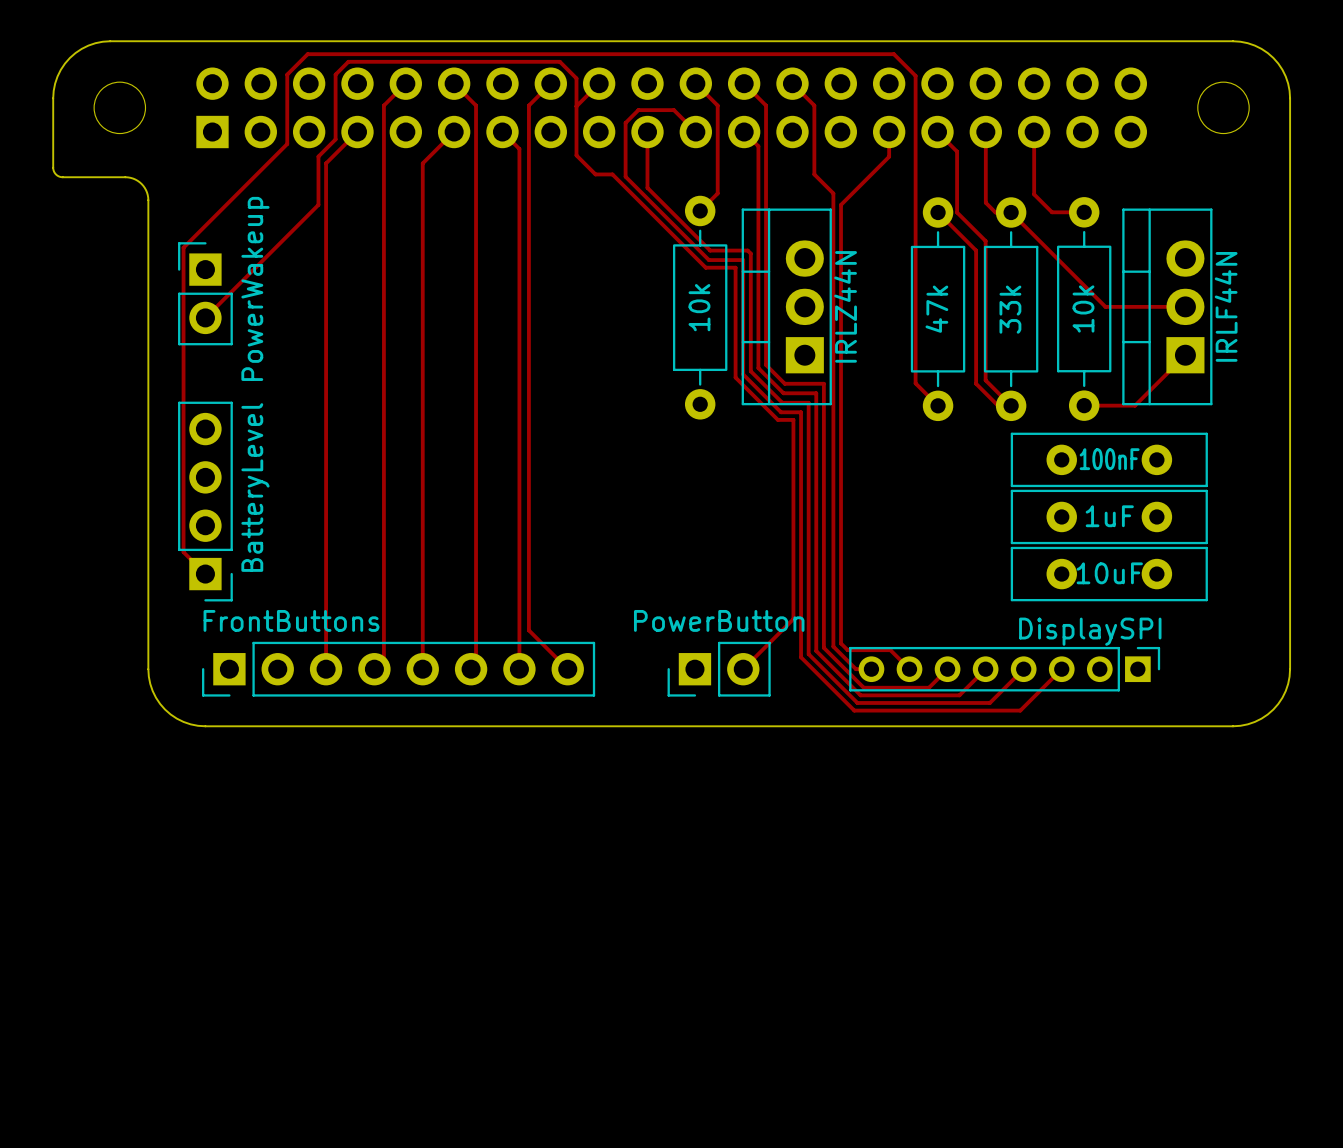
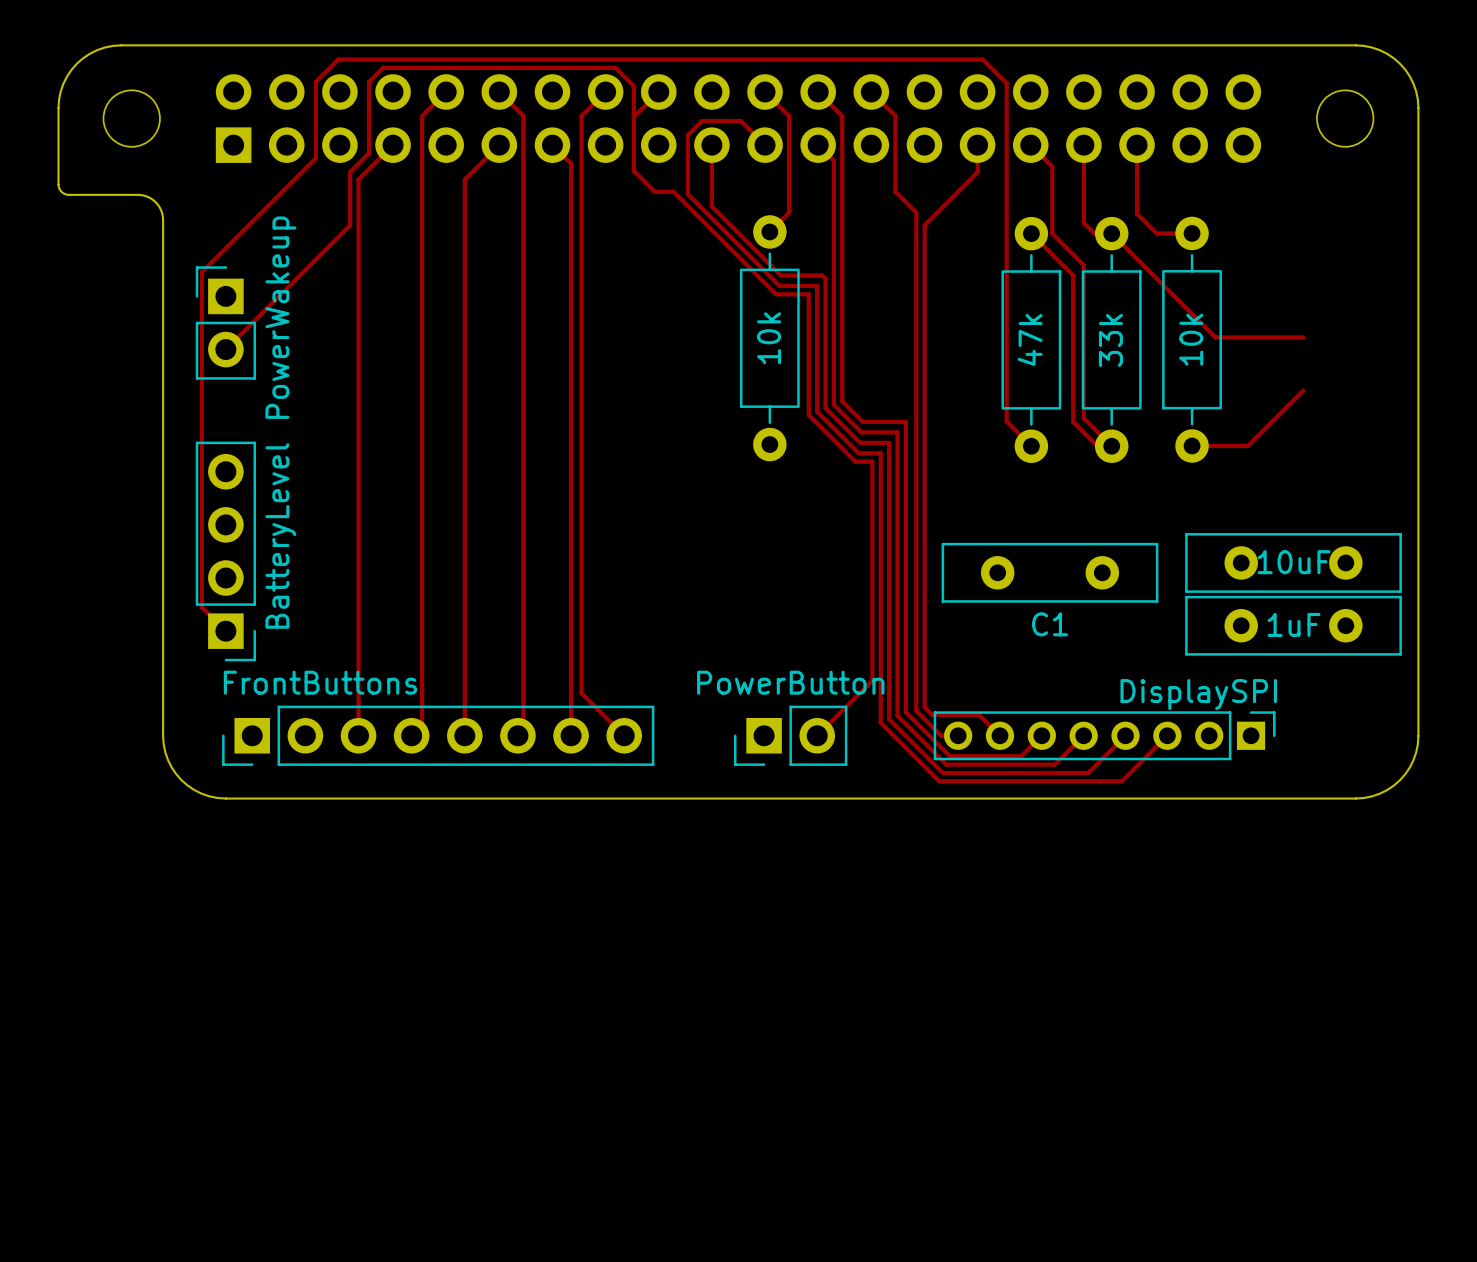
part: IRLZ44N (786, 306) -> none
part: IRLF44N (1167, 306) -> none
part: 100nF (1109, 459) -> none
part position: (1109, 516) -> (1293, 625)
C1: none -> (1049, 572)
part position: (1109, 574) -> (1293, 562)

